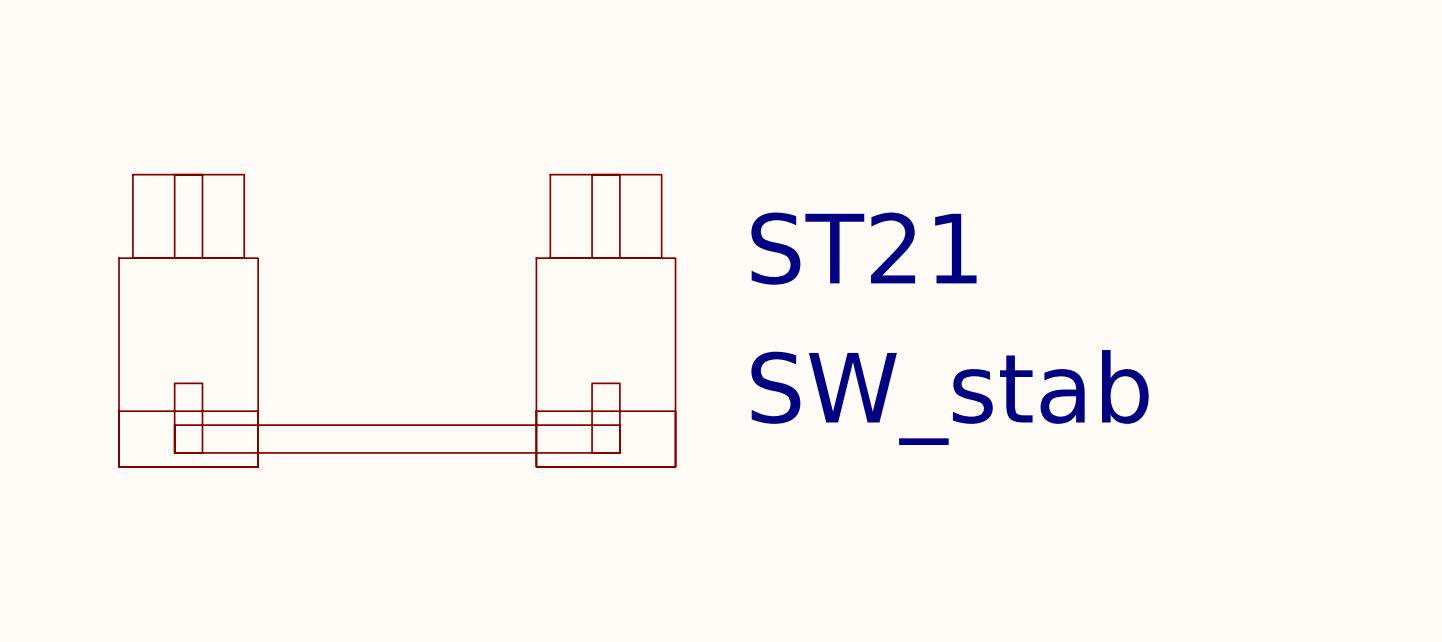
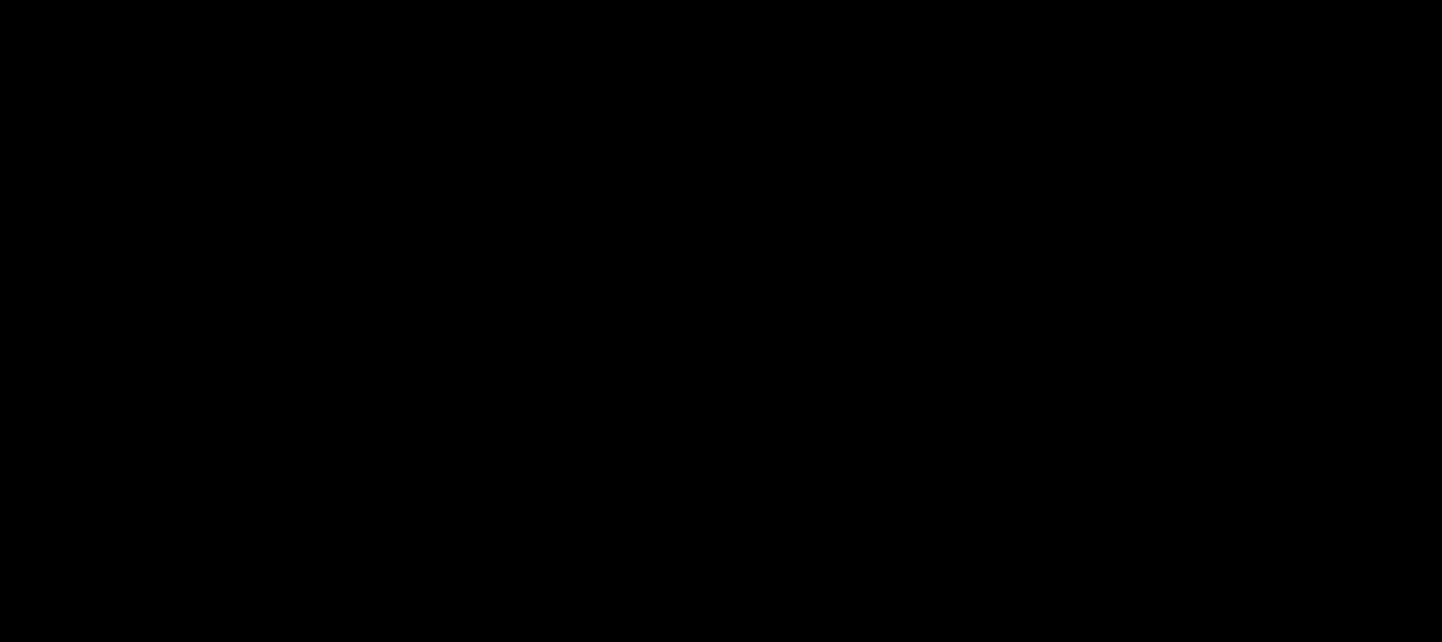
ST21: SW_stab (397, 320) -> none

